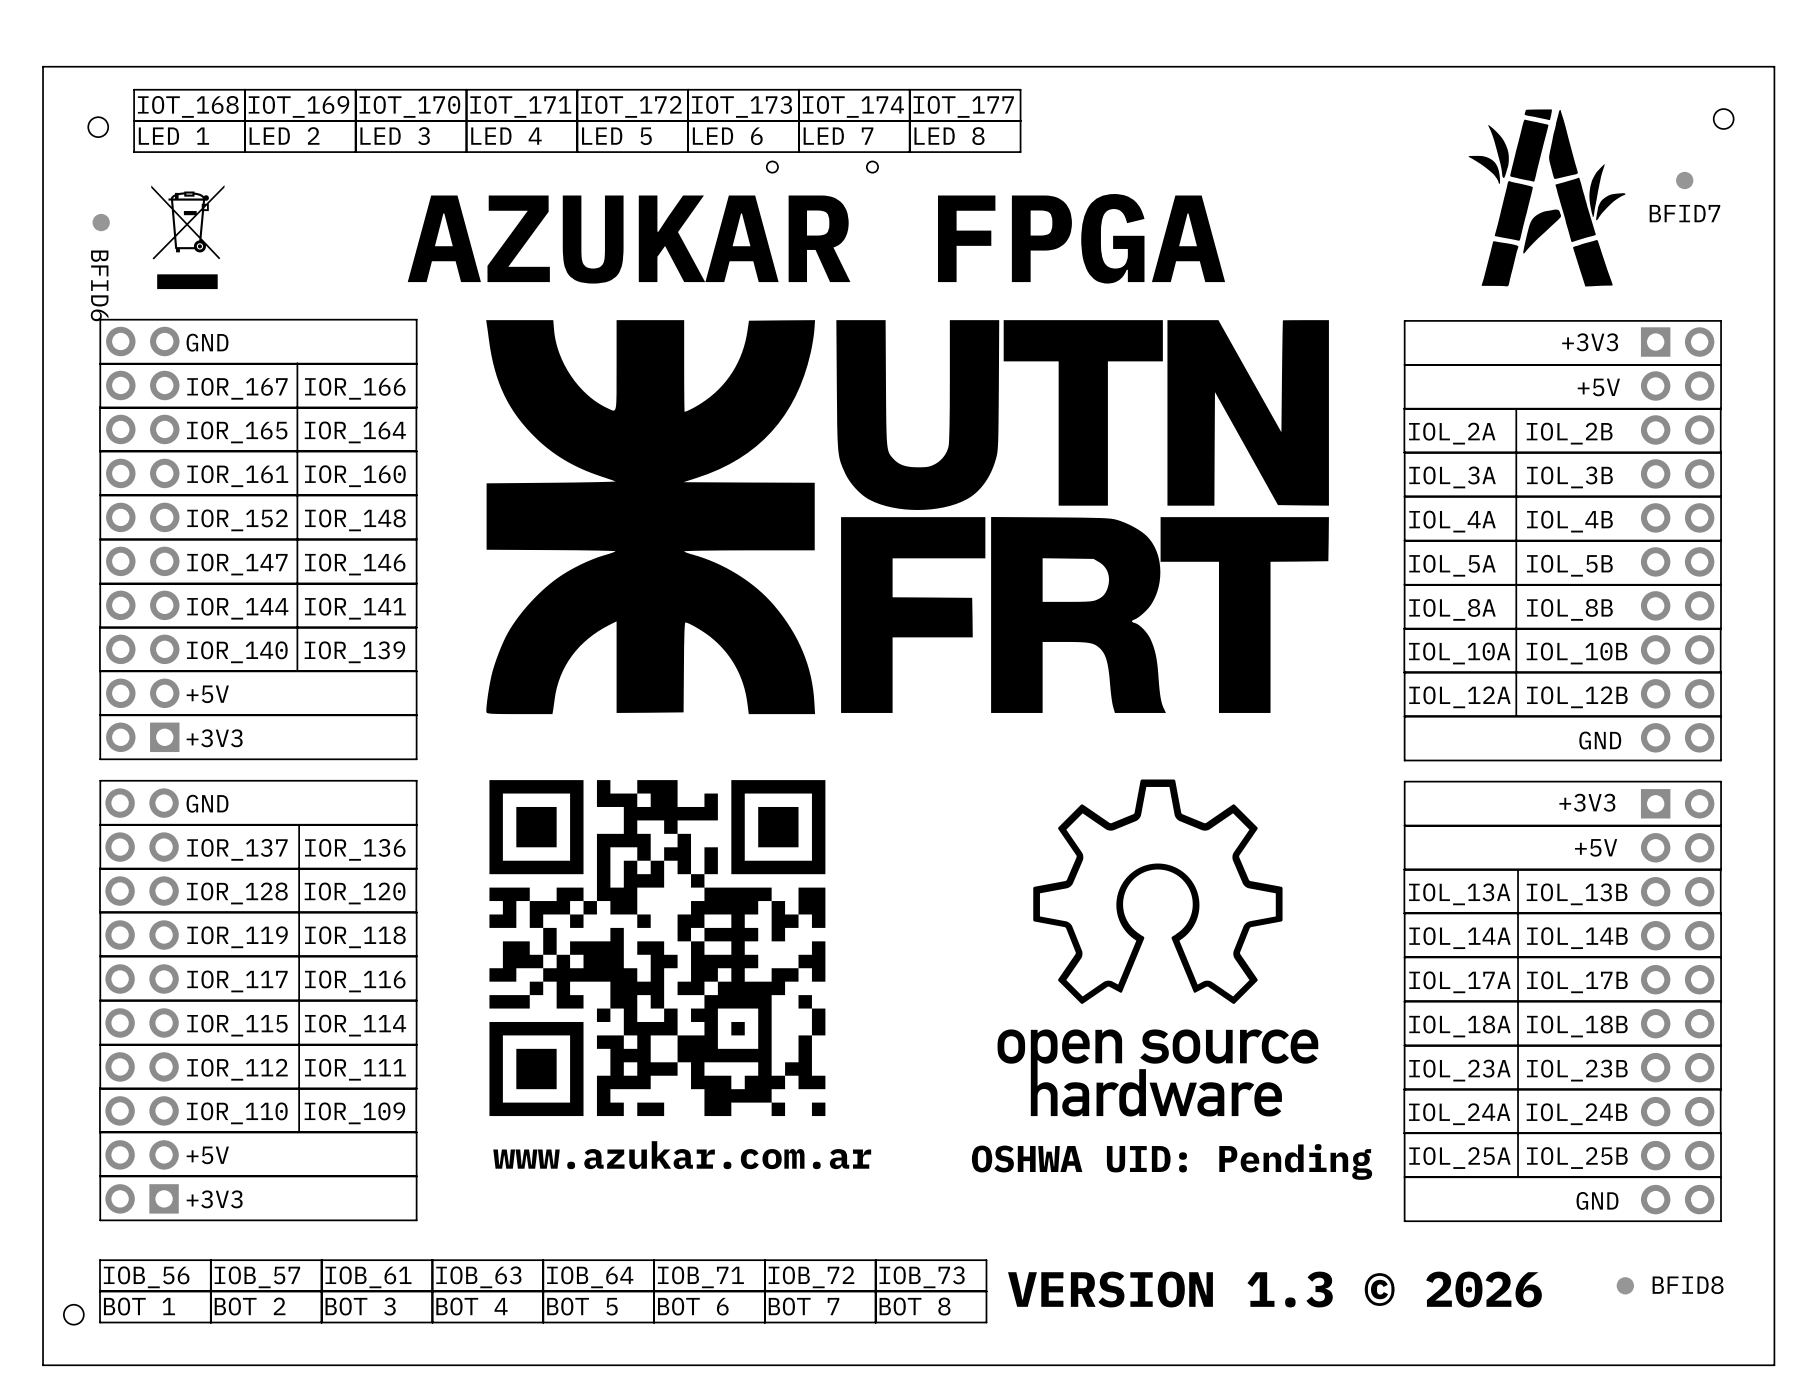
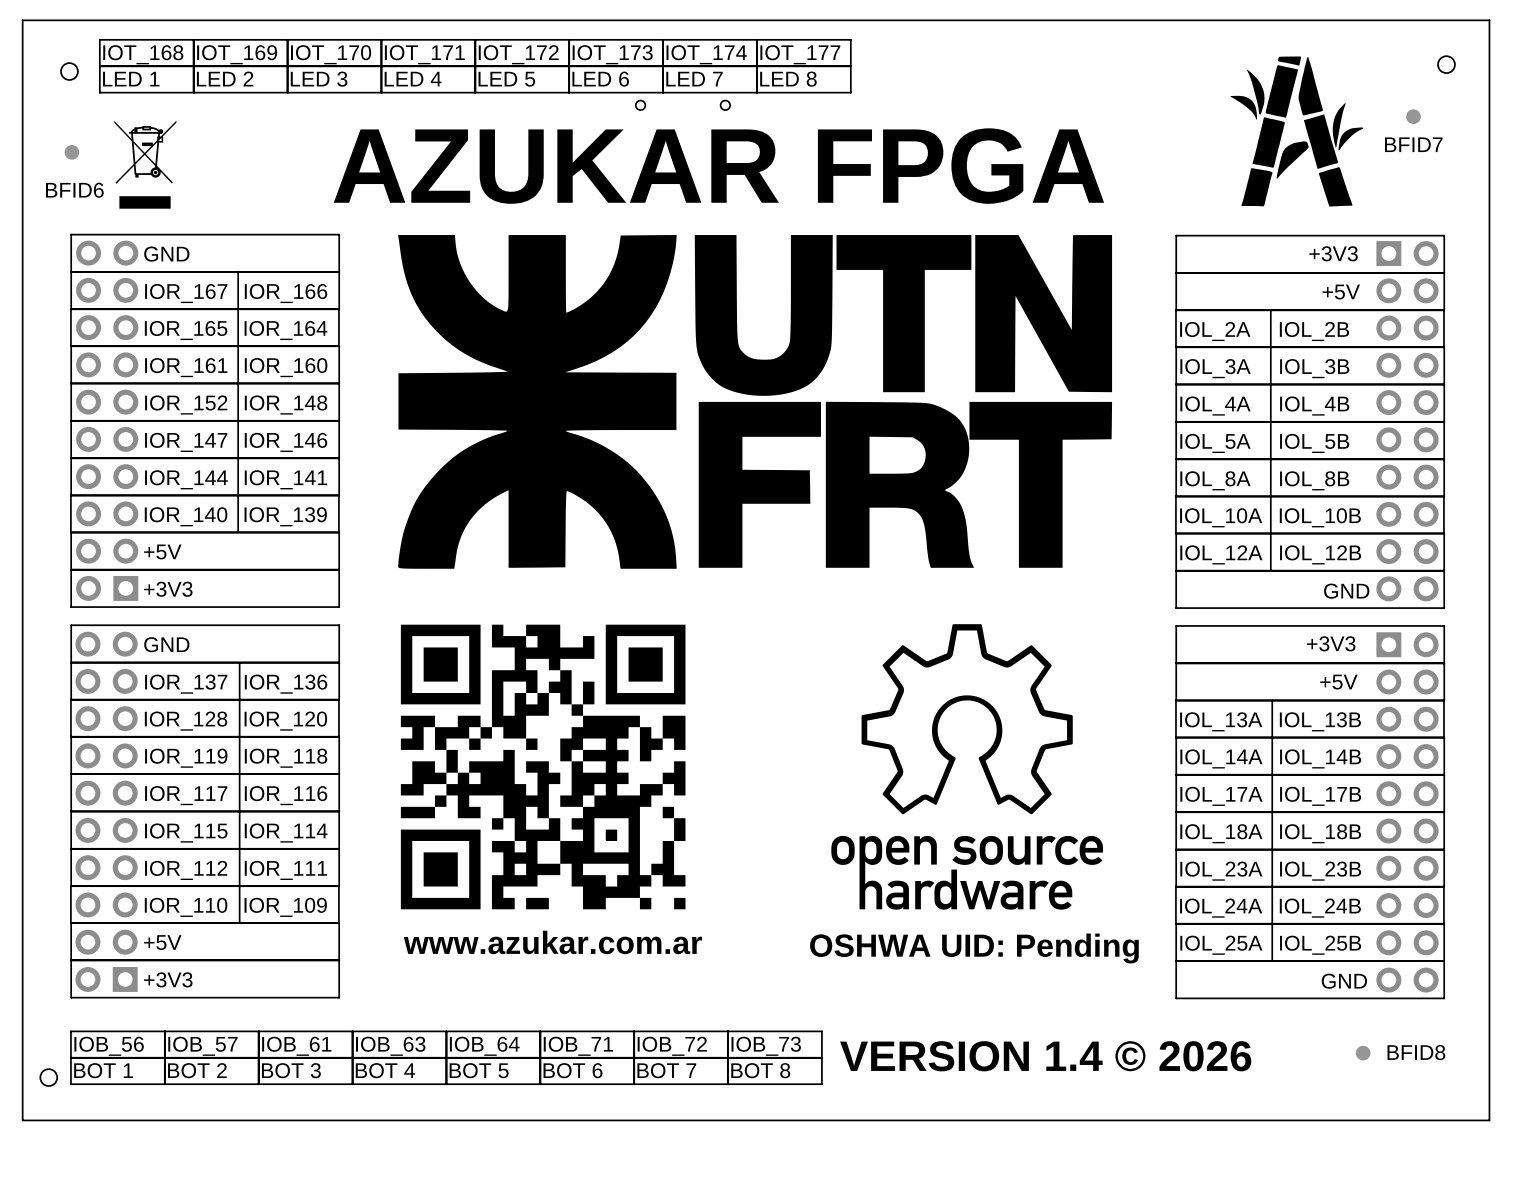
BFID6 name rotation: 0° (99, 285) -> 90° counterclockwise (74, 190)
text: VERSION 1.3 © 2026 (1274, 1289) -> VERSION 1.4 © 2026 (1045, 1056)

